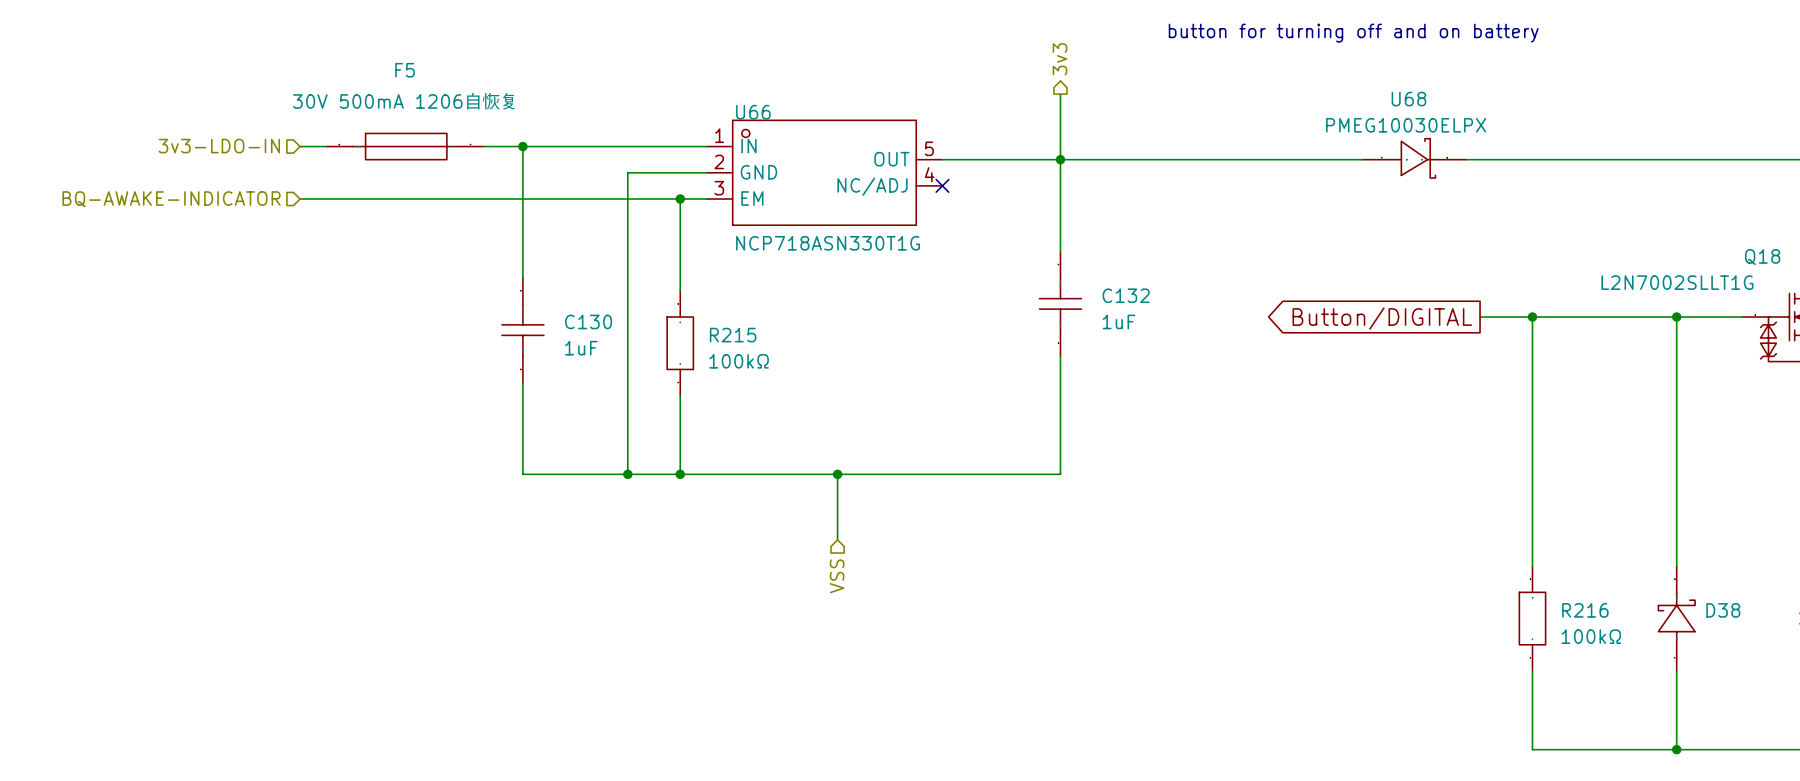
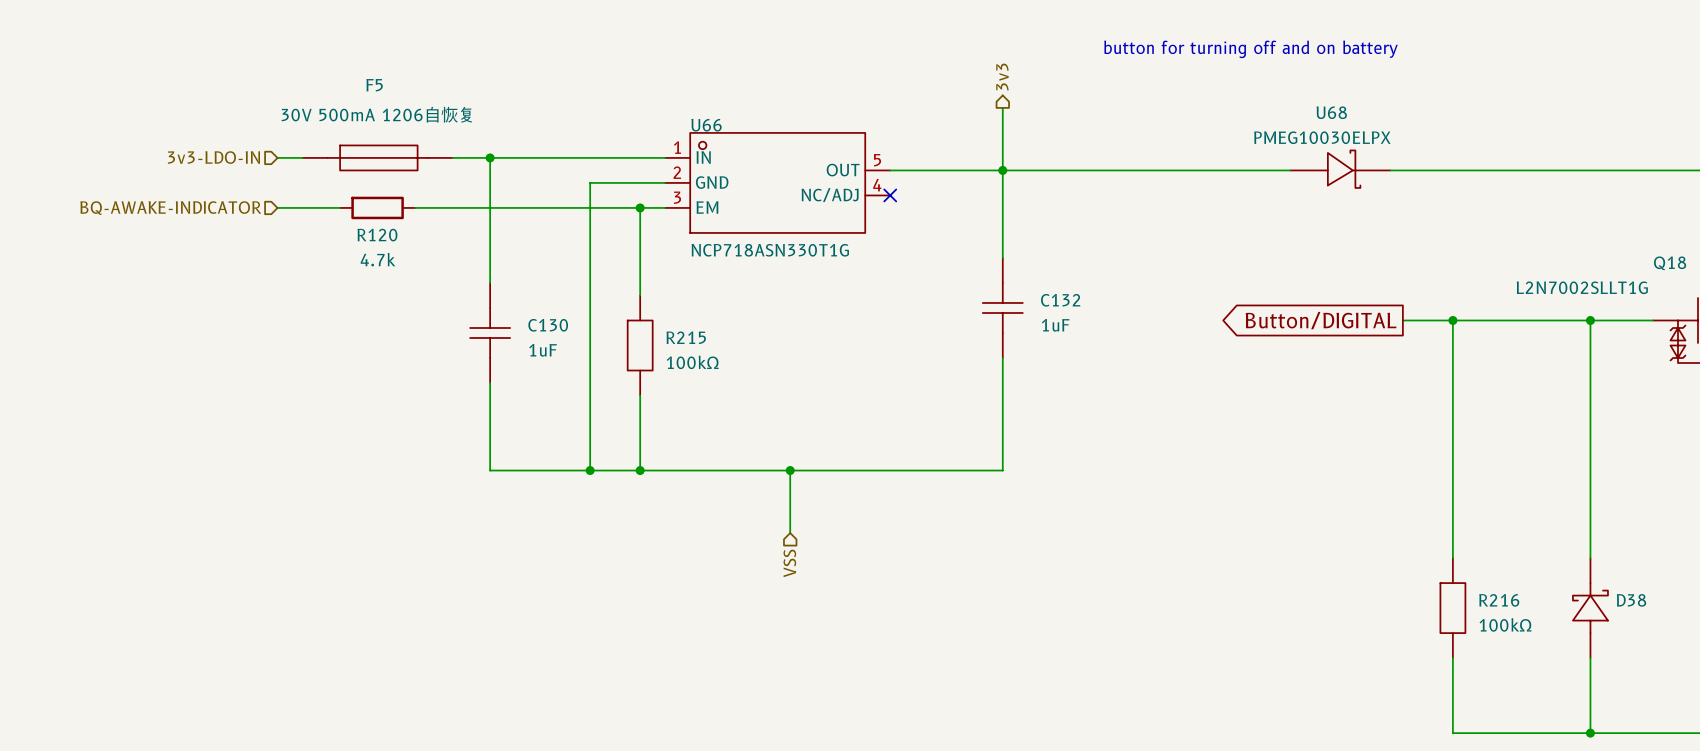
wire: (365, 199) (444, 199) -> none
R120: none -> 4.7k (377, 207)

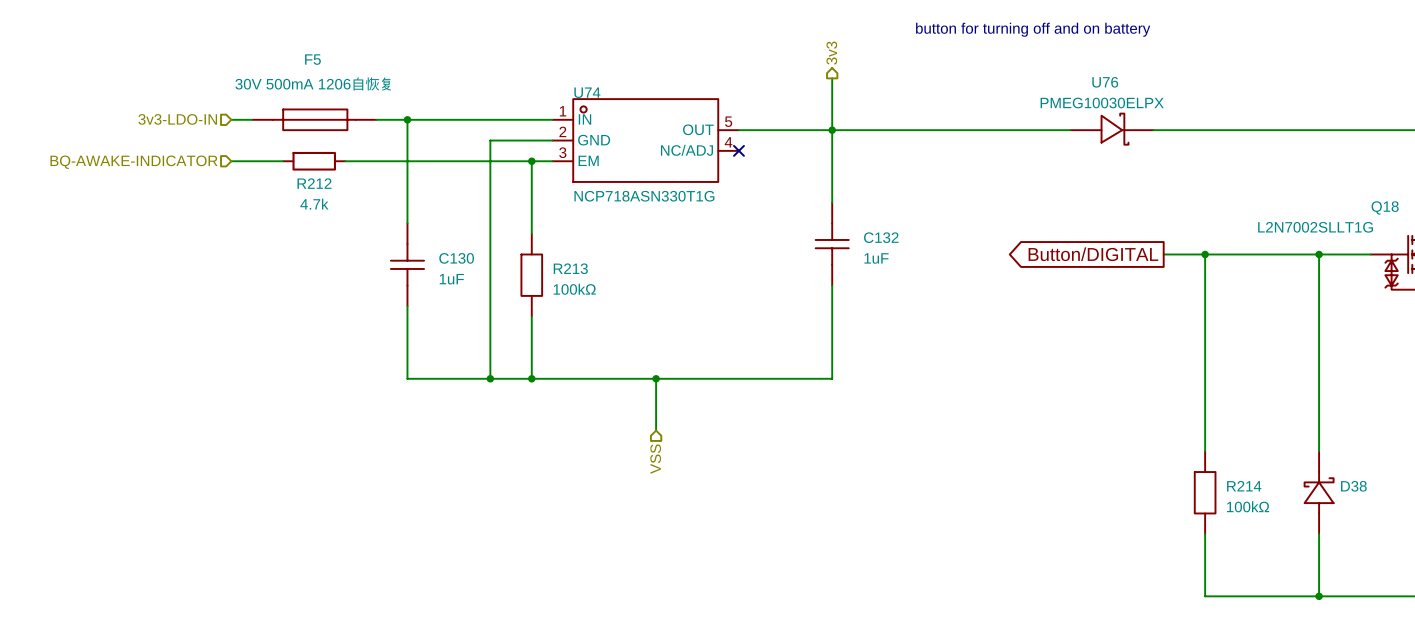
U68 name: U68 (1331, 112) -> U76 (1105, 82)
U66 name: U66 (706, 125) -> U74 (587, 92)
R120 name: R120 (377, 235) -> R212 (314, 183)
R215 name: R215 (686, 337) -> R213 (570, 268)
R216 name: R216 (1499, 600) -> R214 (1244, 486)

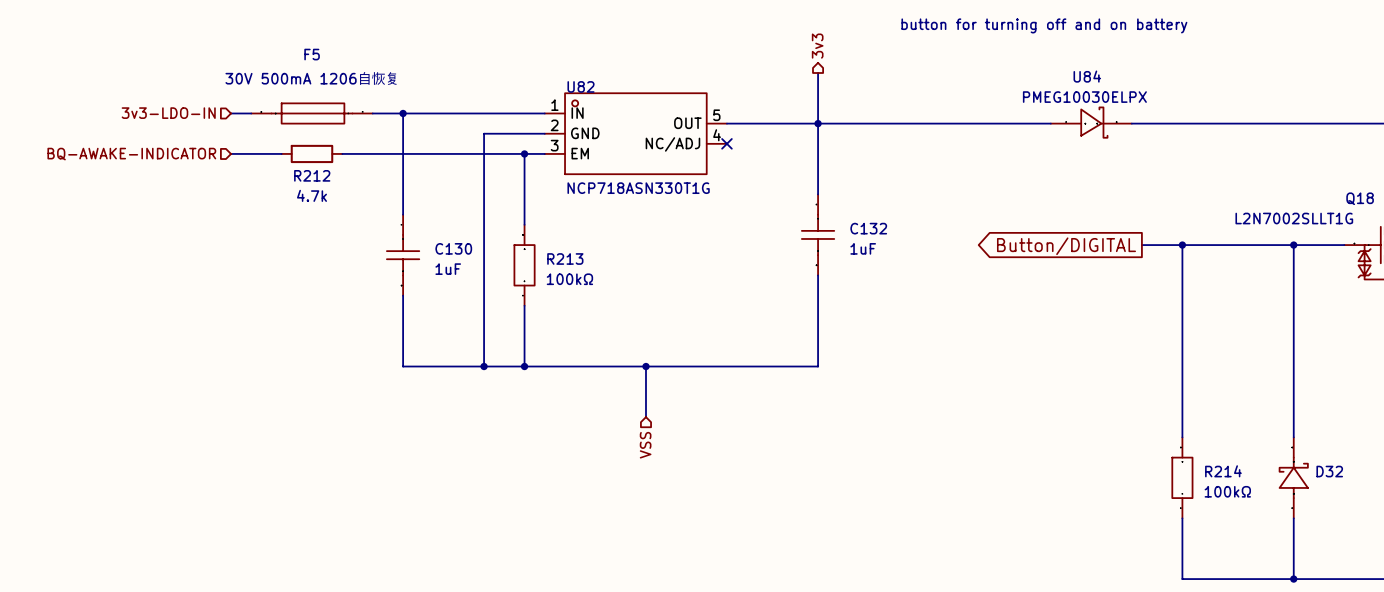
U76 name: U76 (1105, 82) -> U84 (1087, 76)
U74 name: U74 (587, 92) -> U82 (581, 86)
D38 name: D38 (1353, 486) -> D32 (1329, 471)

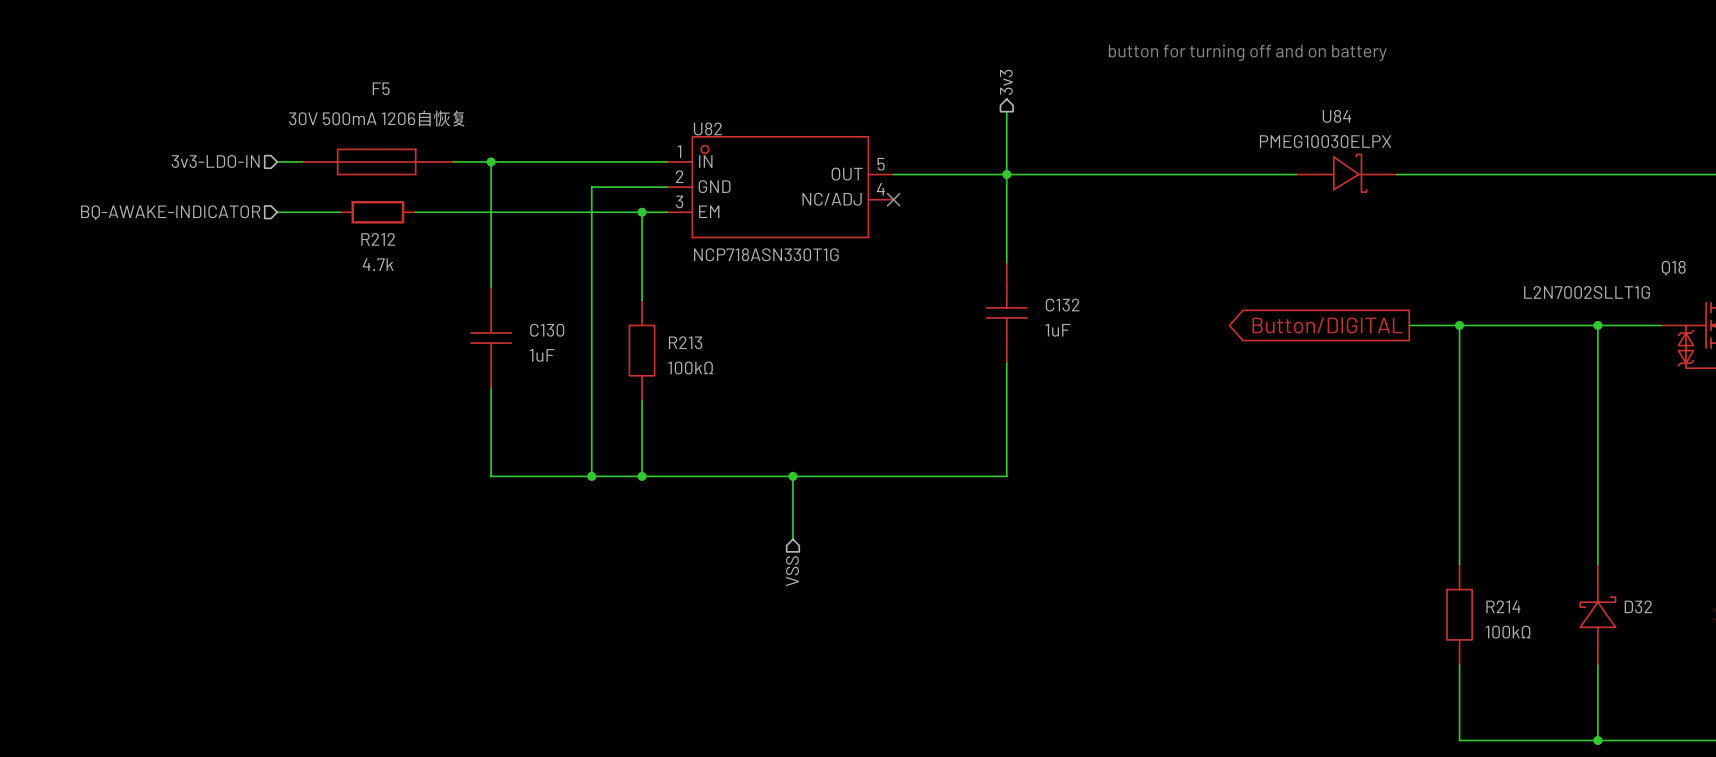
F5 rotation: 0° (311, 113) -> 180° (377, 161)

